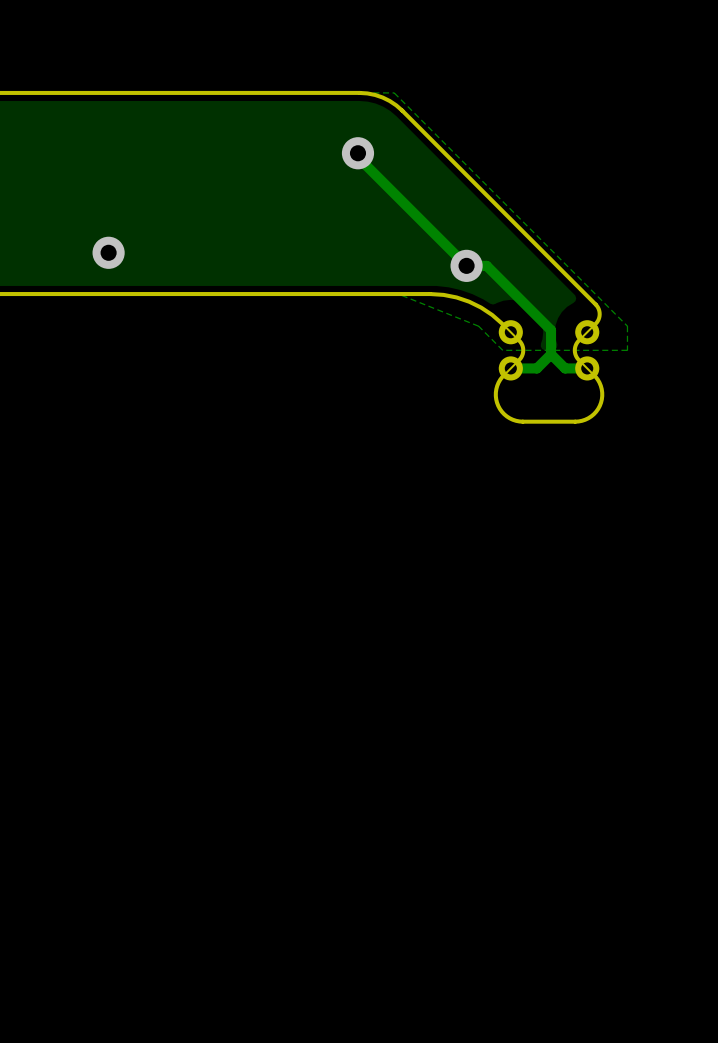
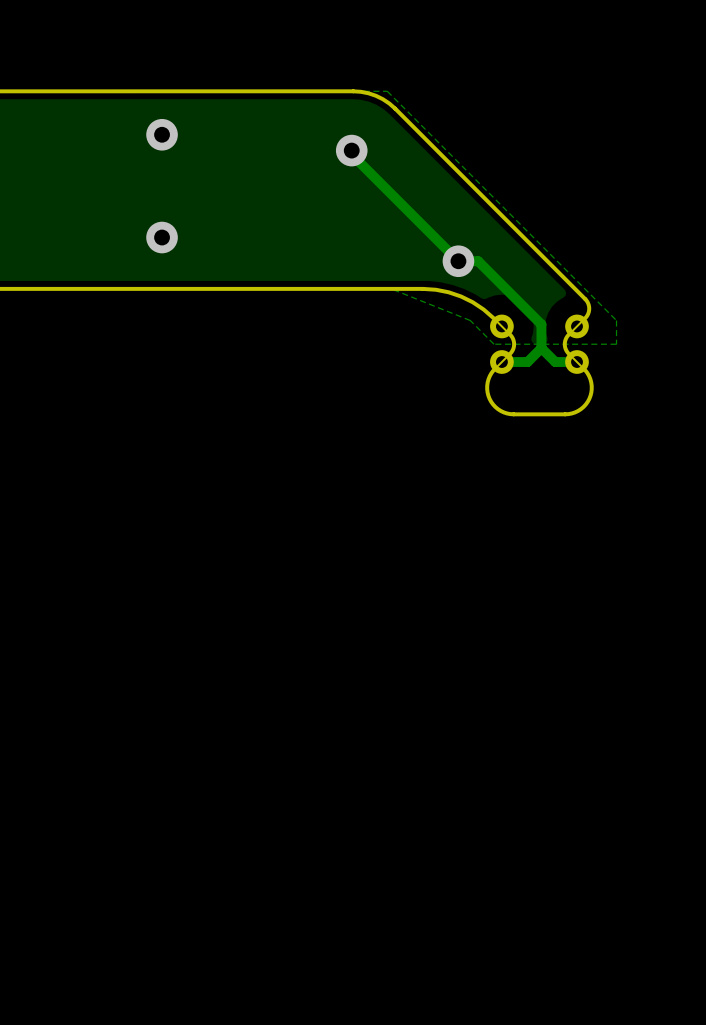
via: none -> (162, 134)
via position: (108, 252) -> (162, 237)

